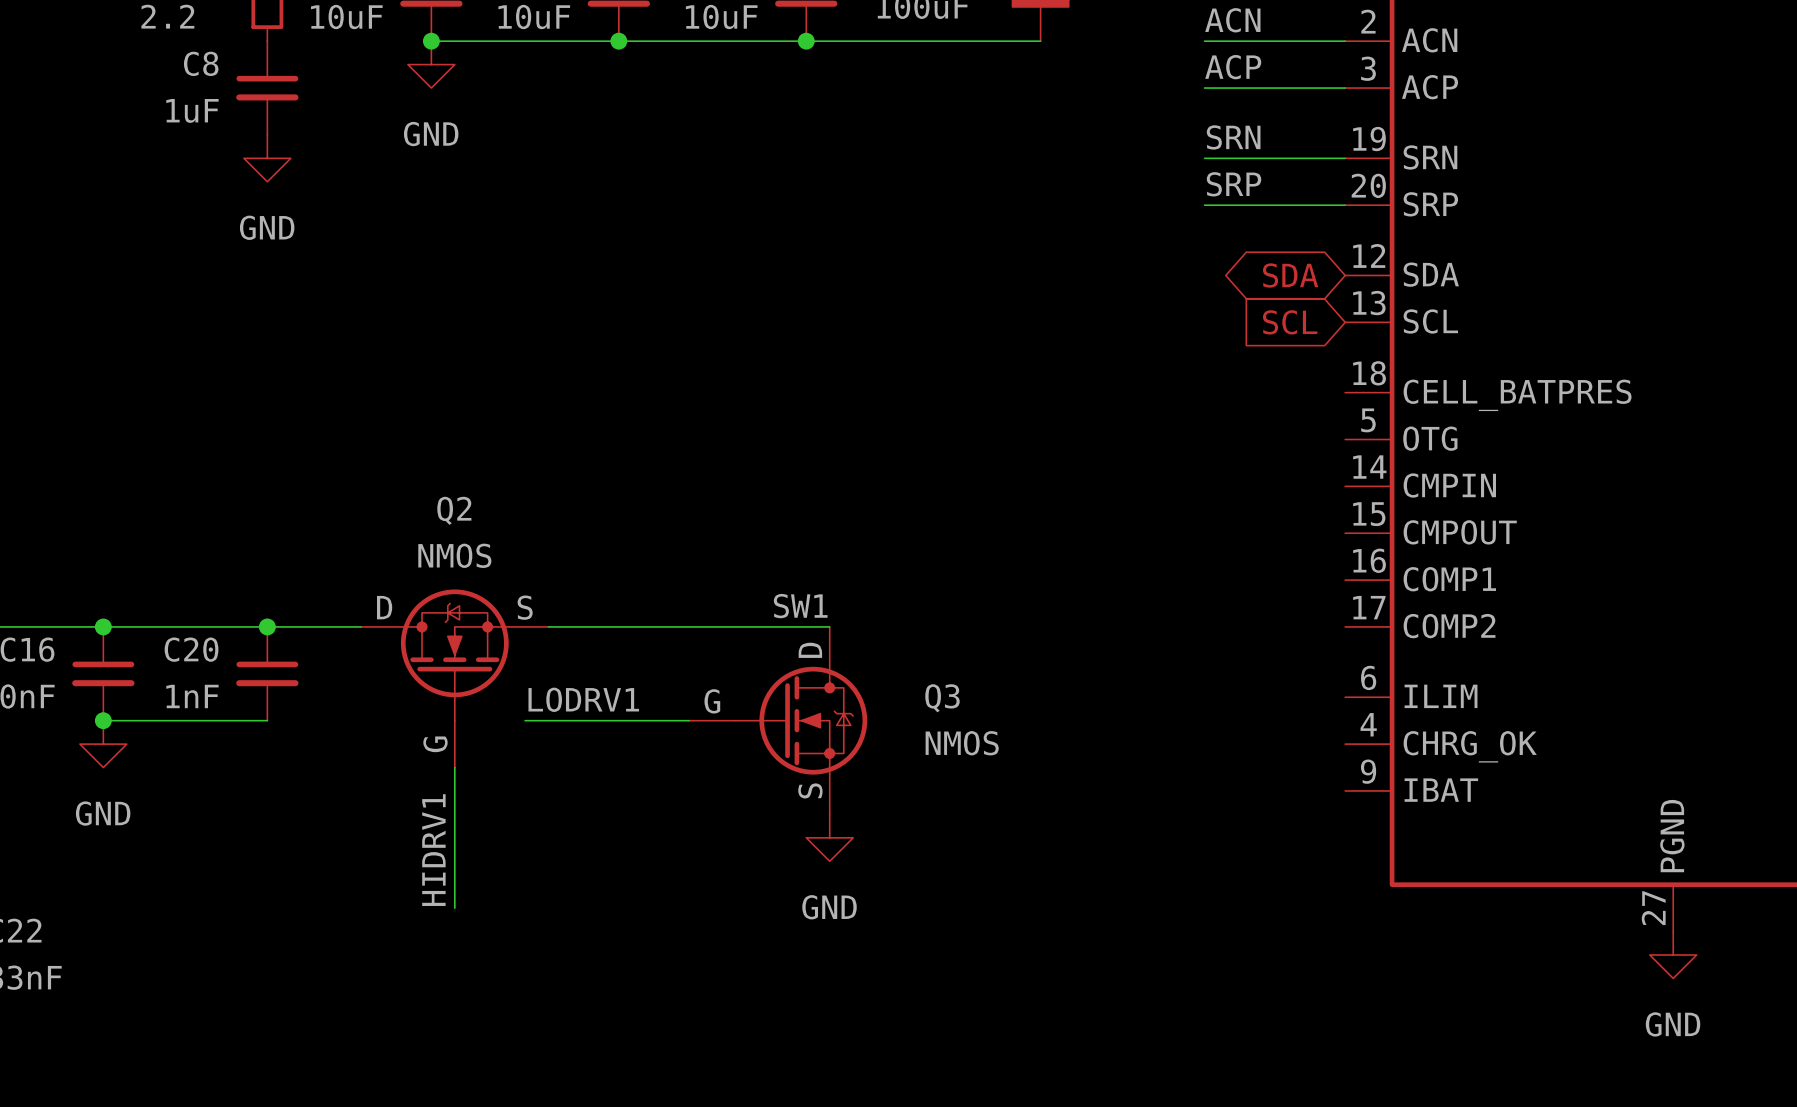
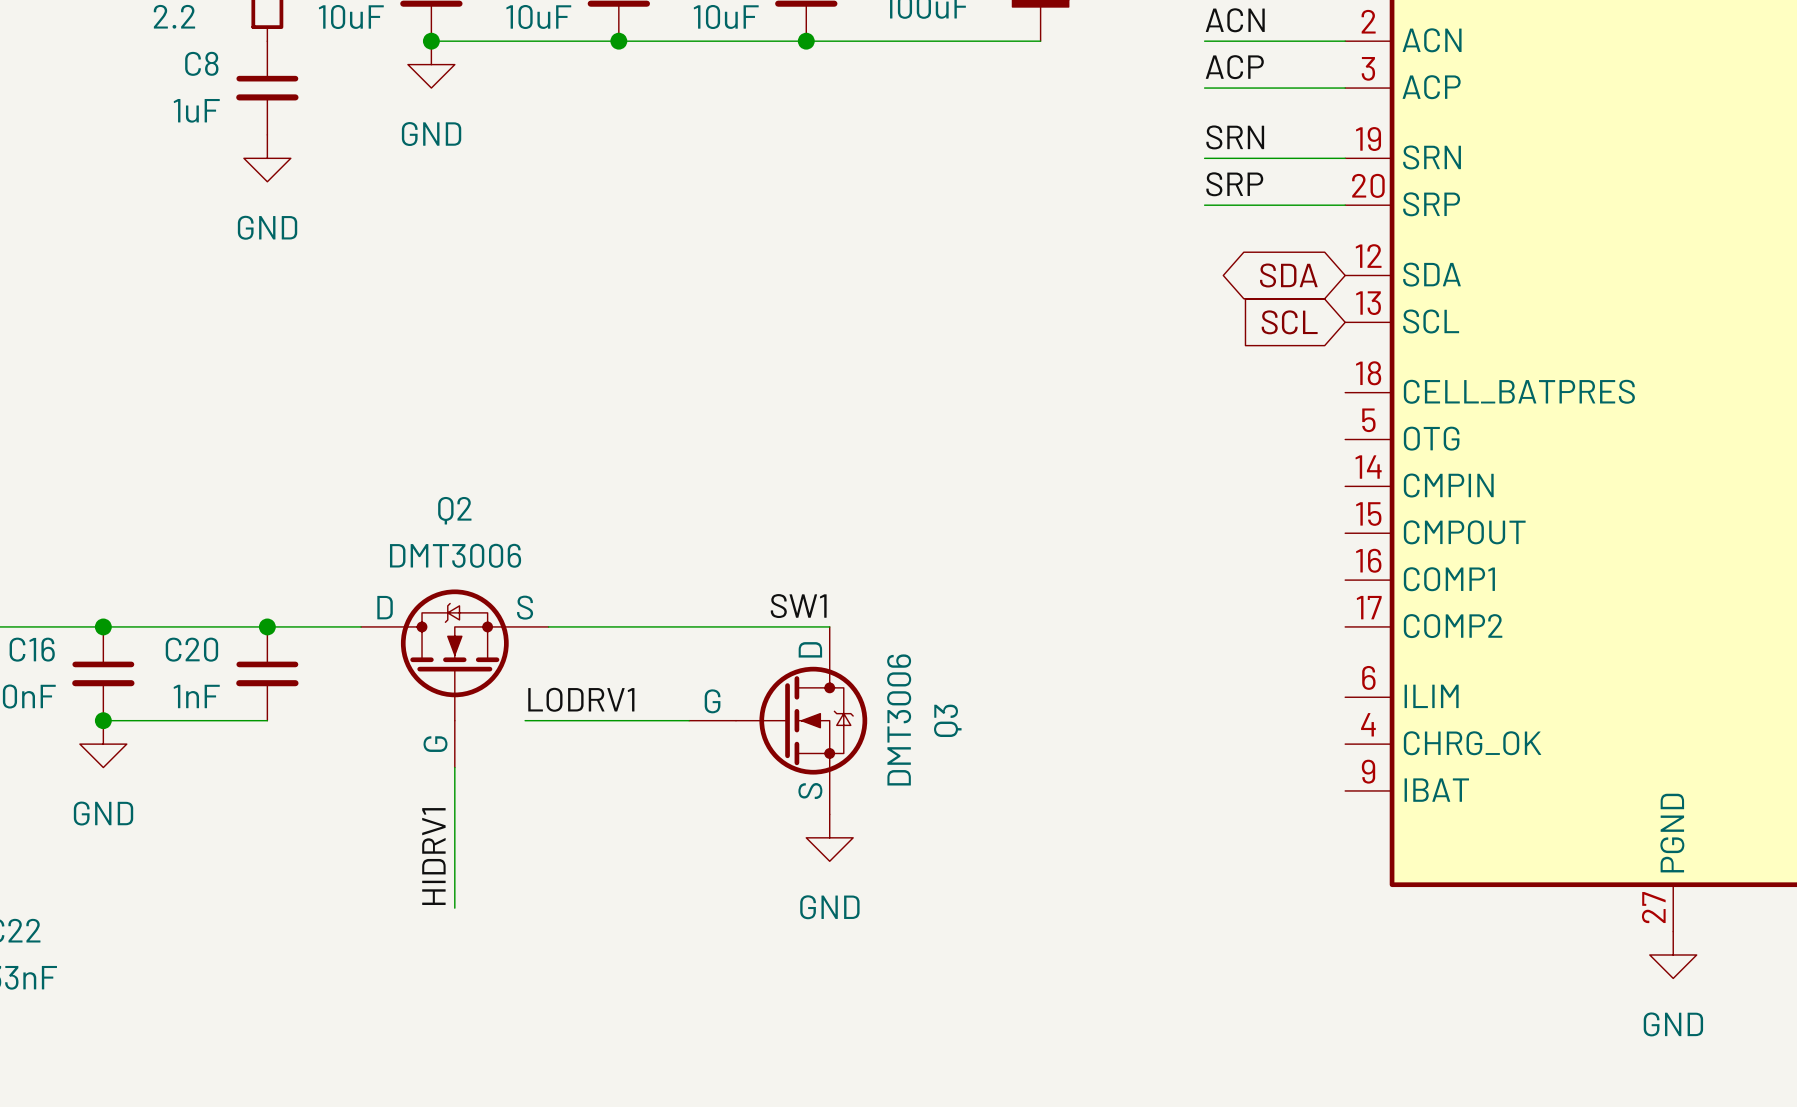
Q2 value: NMOS (454, 555) -> DMT3006 (455, 555)
Q3 name rotation: 0° (942, 698) -> 90° counterclockwise (947, 720)
Q3 value: NMOS (962, 743) -> DMT3006 (899, 719)

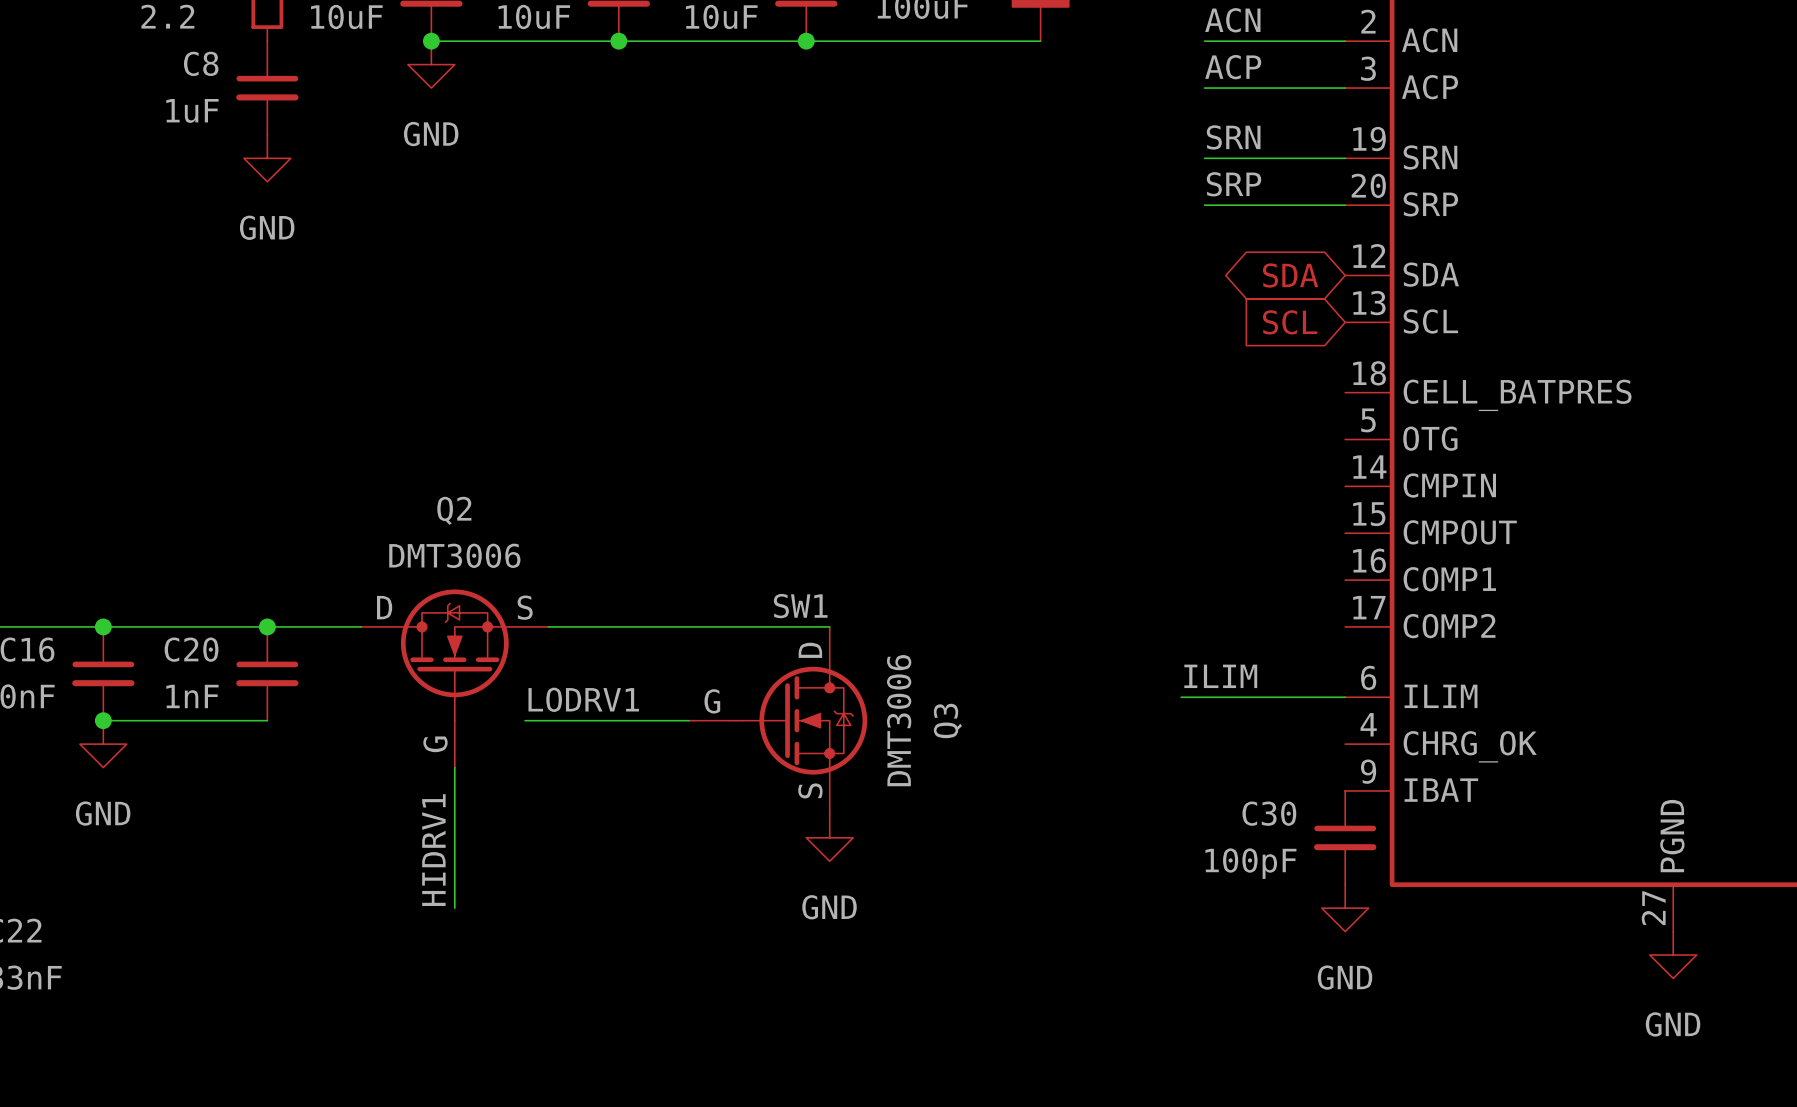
label: none -> ILIM (1220, 676)
wire: none -> (1181, 697) (1345, 697)
C30: none -> 100pF (1345, 837)
power symbol: none -> GND (1345, 908)

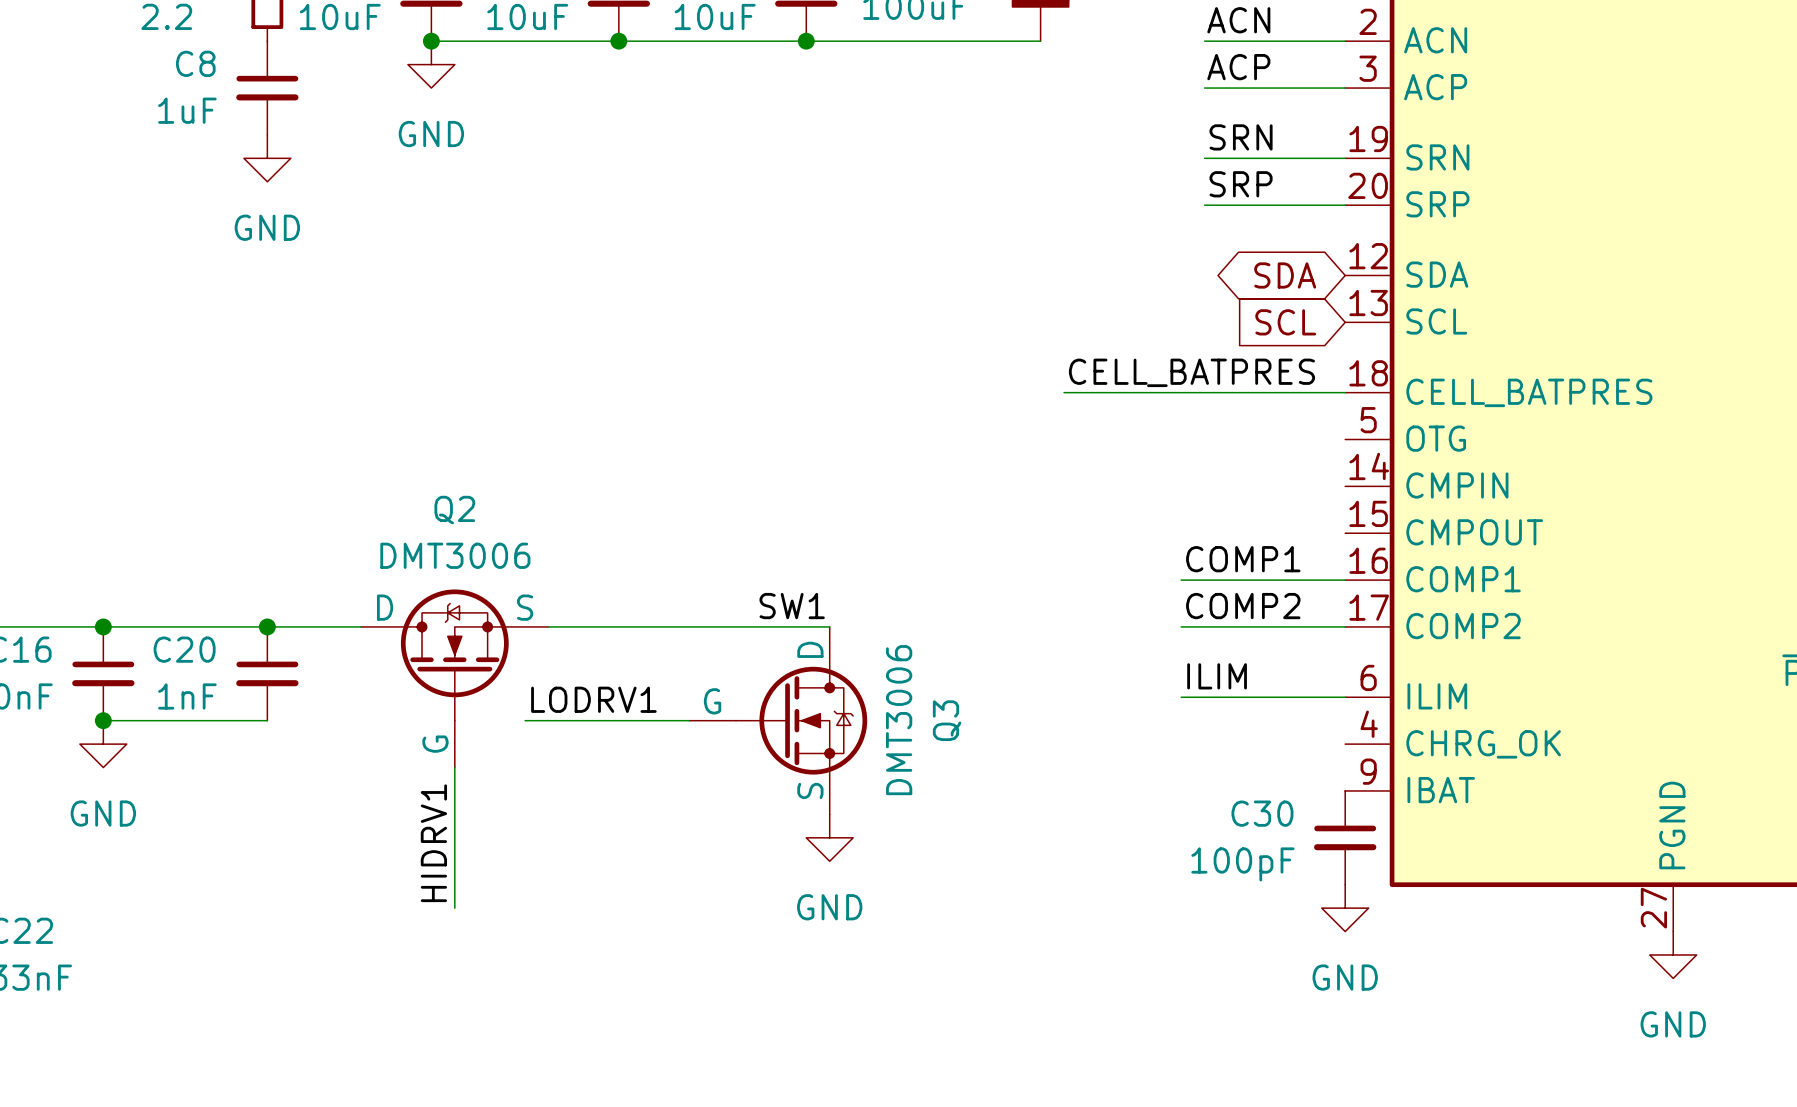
label: none -> CELL_BATPRES (1191, 372)
wire: none -> (1064, 392) (1345, 392)
label: none -> COMP1 (1243, 559)
wire: none -> (1181, 580) (1345, 580)
label: none -> COMP2 (1243, 606)
wire: none -> (1181, 626) (1345, 626)

